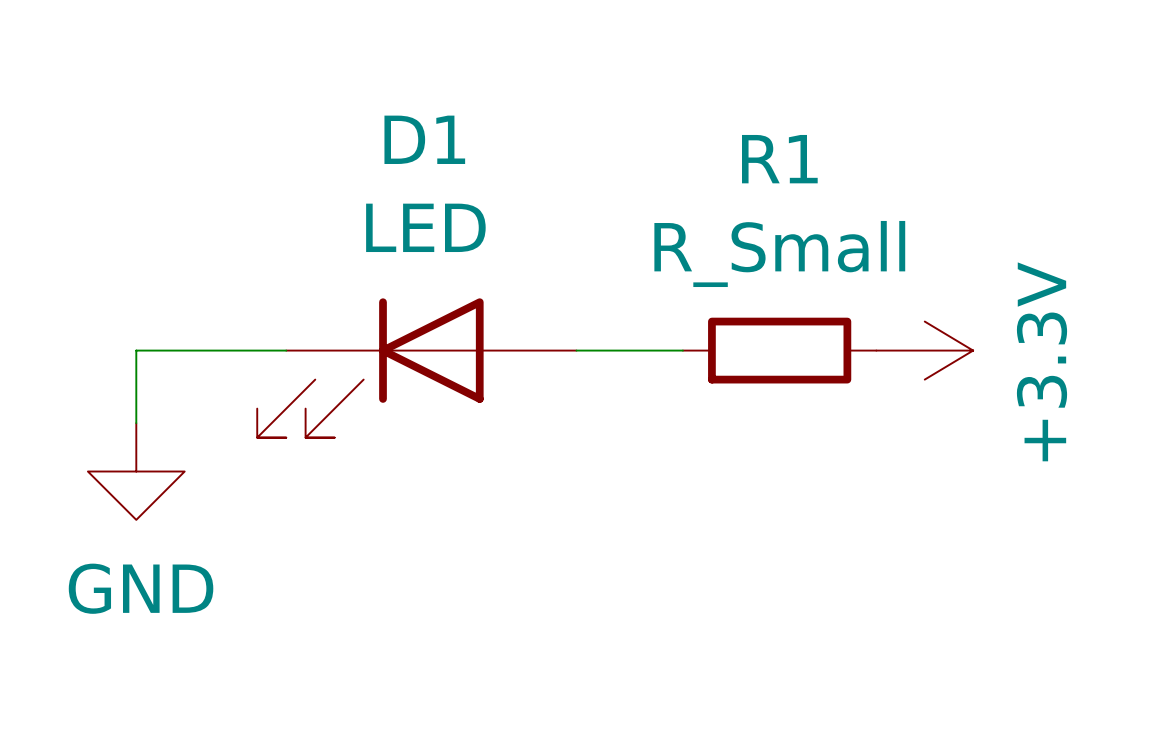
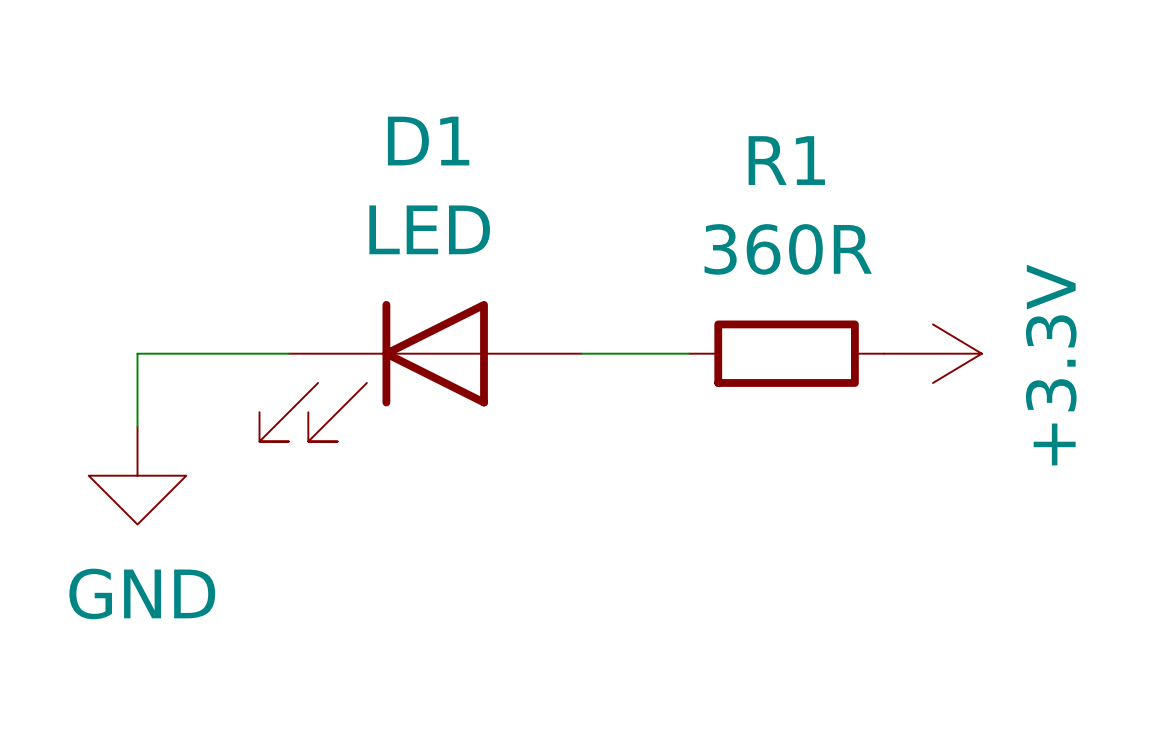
R1 value: R_Small (779, 253) -> 360R (788, 249)

